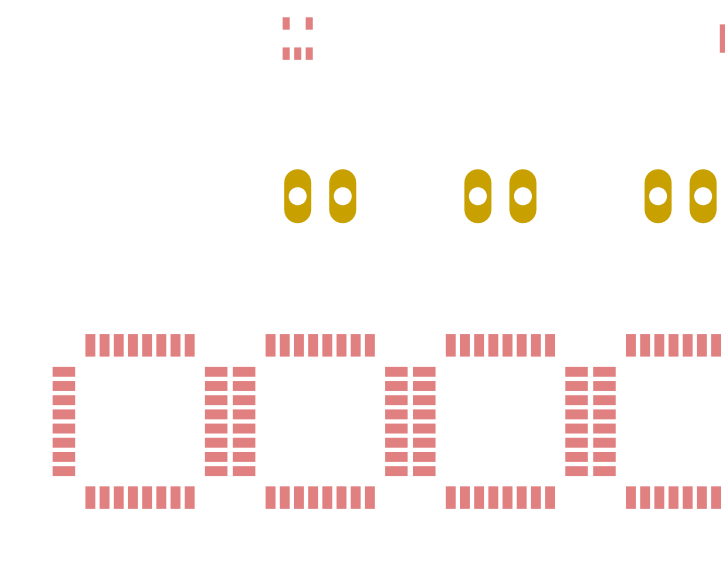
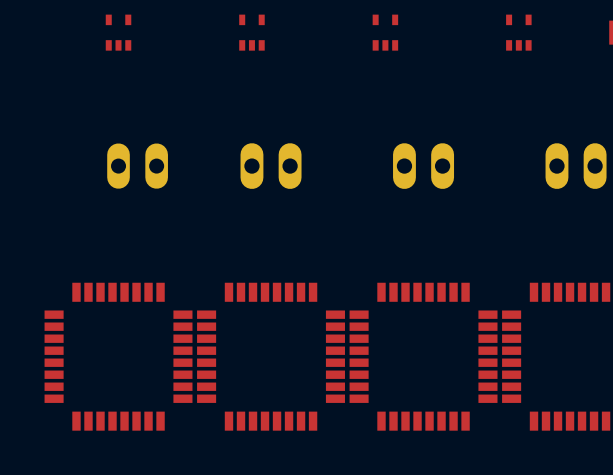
part: none -> (118, 32)
part: none -> (385, 32)
part: none -> (518, 32)
part: none -> (137, 166)

